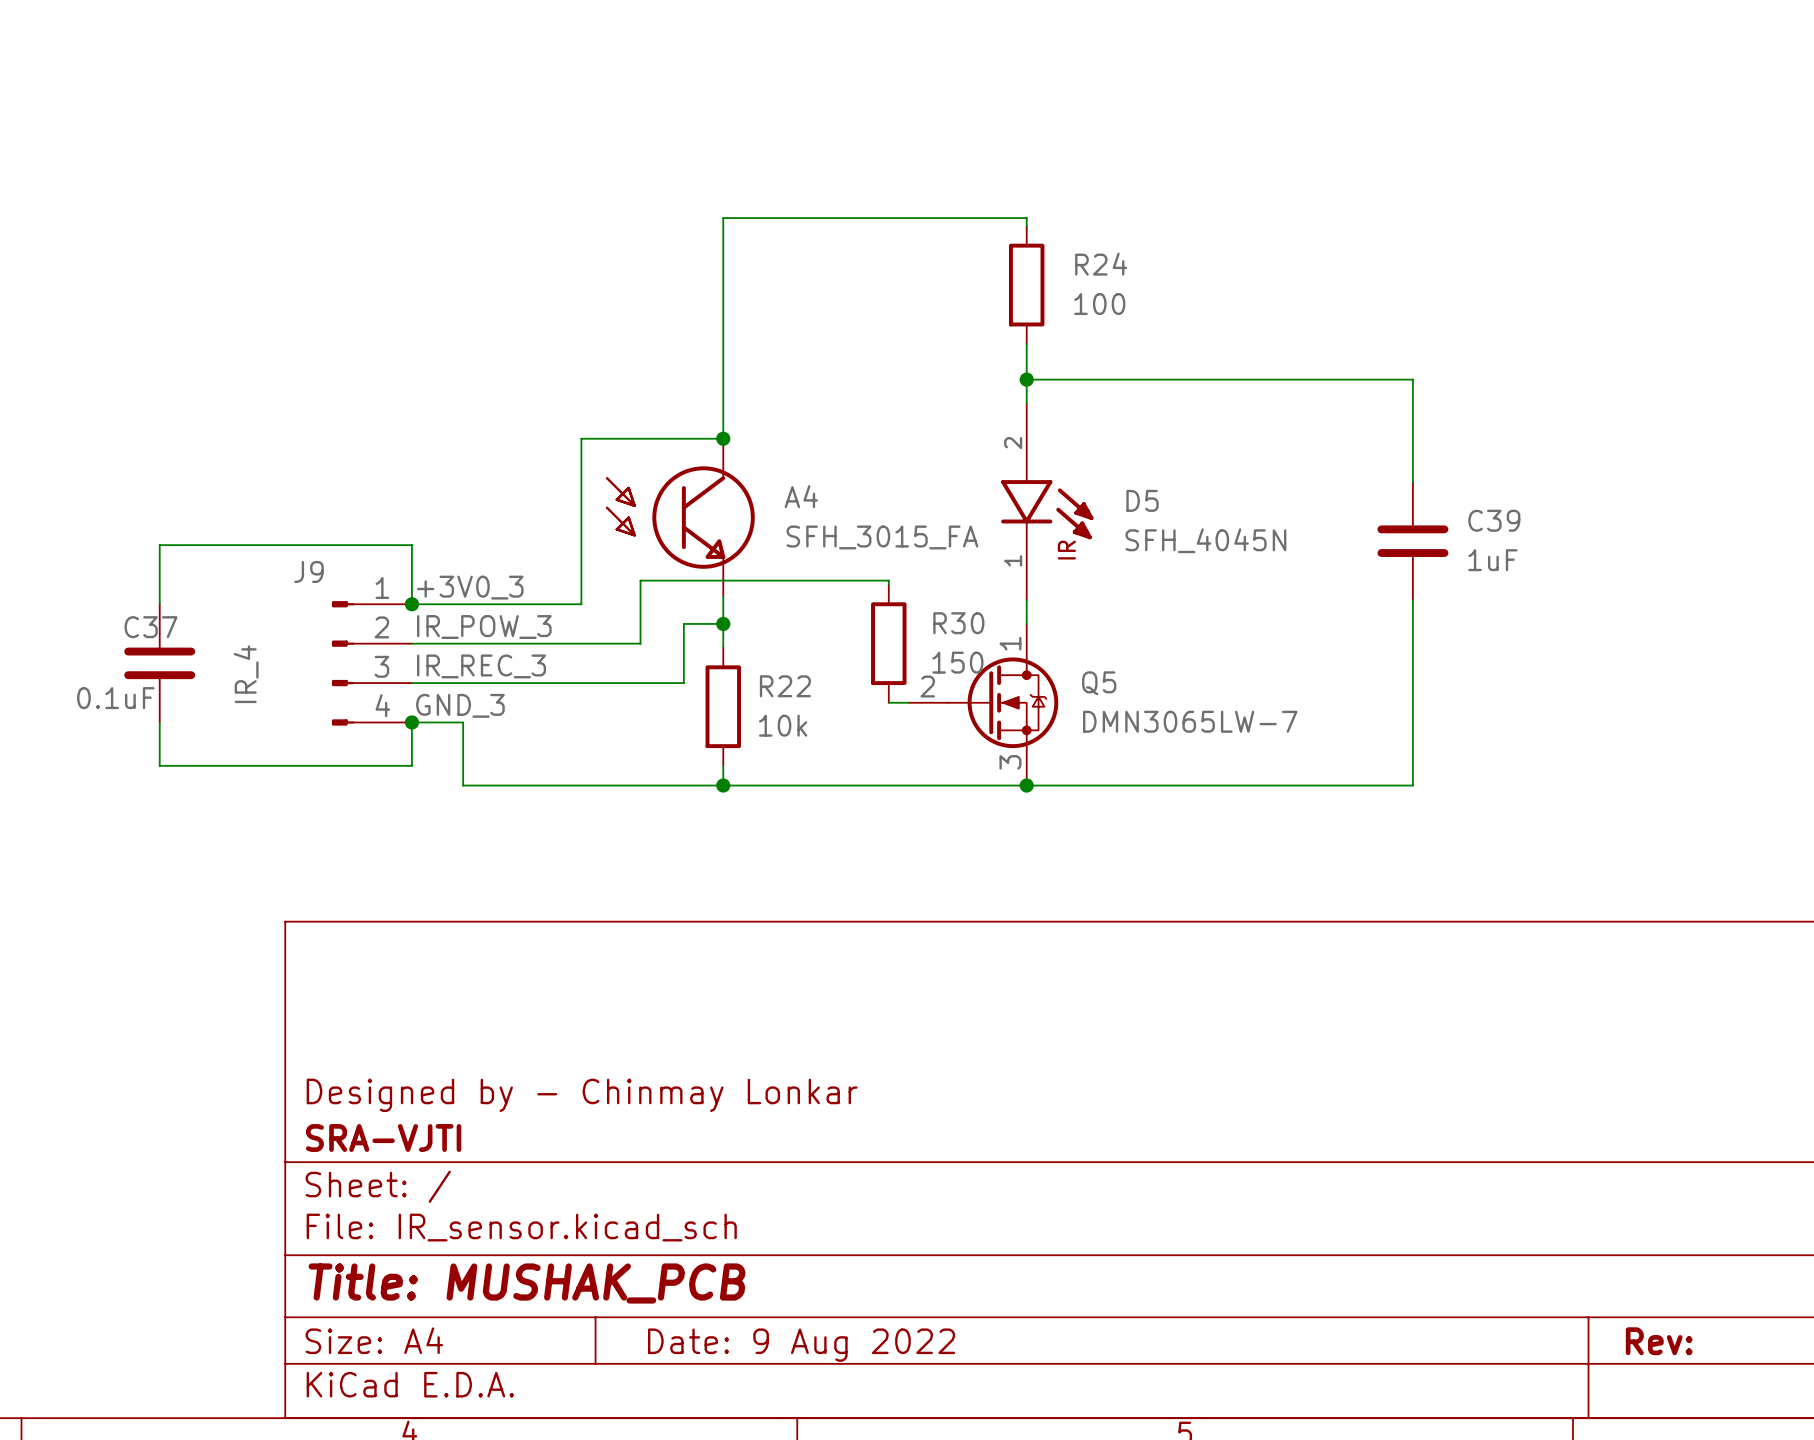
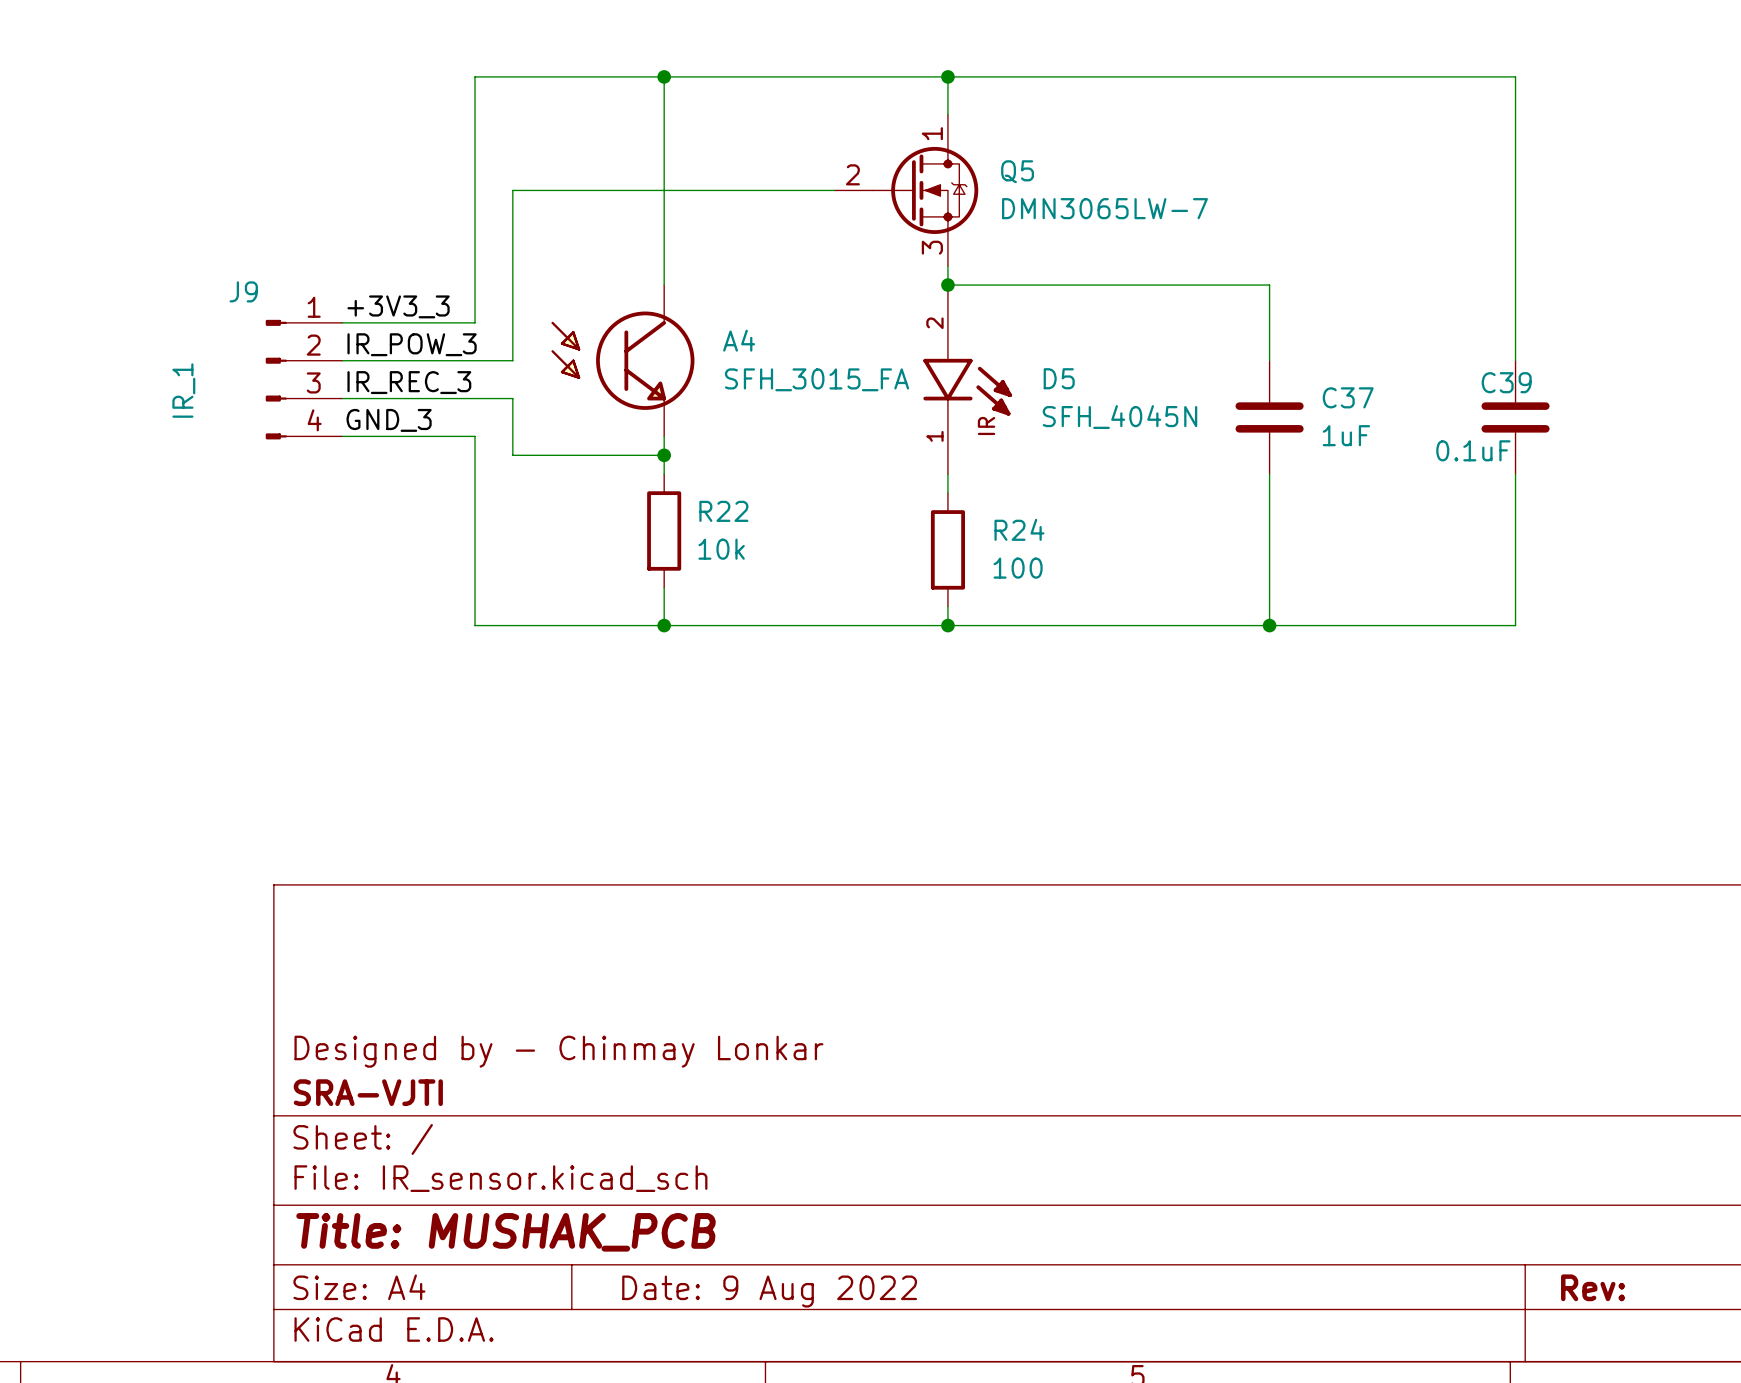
wire: none -> (664, 76) (664, 285)
junction: none -> (664, 76)
wire: none -> (947, 76) (947, 114)
junction: none -> (947, 76)
wire: none -> (834, 190) (512, 190) (512, 360) (342, 360)
wire: (1026, 225) (1026, 218) (723, 218) (723, 438) (581, 438) (581, 604) (411, 604) (411, 545) (159, 545) (159, 604) -> none
wire: none -> (947, 266) (947, 285) (1269, 285) (1269, 360)
R24 position: (1026, 285) -> (947, 549)
label: none -> +3V3_3 (398, 306)
wire: none -> (342, 322) (474, 322) (474, 76) (1515, 76) (1515, 360)
wire: (1026, 344) (1026, 403) -> none
wire: (1026, 379) (1412, 379) (1412, 482) -> none
junction position: (1026, 379) -> (947, 285)
wire: none -> (342, 398) (512, 398) (512, 455) (664, 455)
junction position: (723, 438) -> (664, 455)
wire: none -> (342, 436) (474, 436) (474, 625) (1515, 625) (1515, 474)
wire: none -> (664, 436) (664, 474)
wire: none -> (947, 474) (947, 493)
wire: none -> (1269, 474) (1269, 625)
D5 position: (1047, 501) -> (967, 379)
A4 position: (680, 517) -> (622, 360)
C39 name position: C39 (1494, 520) -> C39 (1506, 382)
C39 position: (1412, 541) -> (1515, 417)
C39 value: 1uF (1492, 560) -> 0.1uF (1473, 450)
wire: (888, 584) (888, 580) (640, 580) (640, 643) (411, 643) -> none
label: +3V0_3 (470, 587) -> none
wire: (723, 596) (723, 647) -> none
wire: (1026, 600) (1026, 623) -> none
wire: (1412, 600) (1412, 785) (463, 785) (463, 722) (411, 722) (411, 765) (159, 765) (159, 722) -> none
junction: (411, 604) -> none
wire: none -> (664, 587) (664, 625)
wire: (723, 623) (683, 623) (683, 683) (411, 683) -> none
junction position: (723, 623) -> (664, 625)
C37 name position: C37 (150, 627) -> C37 (1348, 397)
label position: IR_POW_3 (484, 627) -> IR_POW_3 (412, 344)
R30: 150 (888, 643) -> none
junction: none -> (947, 625)
junction: none -> (1269, 625)
C37 position: (159, 663) -> (1269, 417)
J9 position: (371, 663) -> (304, 379)
label position: IR_REC_3 (481, 666) -> IR_REC_3 (409, 382)
J9 value: IR_4 (246, 674) -> IR_1 (183, 390)
C37 value: 0.1uF (115, 698) -> 1uF (1346, 435)
wire: (888, 702) (908, 702) -> none
Q5 position: (983, 702) -> (906, 190)
label position: GND_3 (460, 705) -> GND_3 (389, 420)
R22 position: (723, 706) -> (664, 530)
junction: (411, 722) -> none
wire: (723, 765) (723, 785) -> (947, 606) (947, 625)
junction: (723, 785) -> none
junction: (1026, 785) -> none

